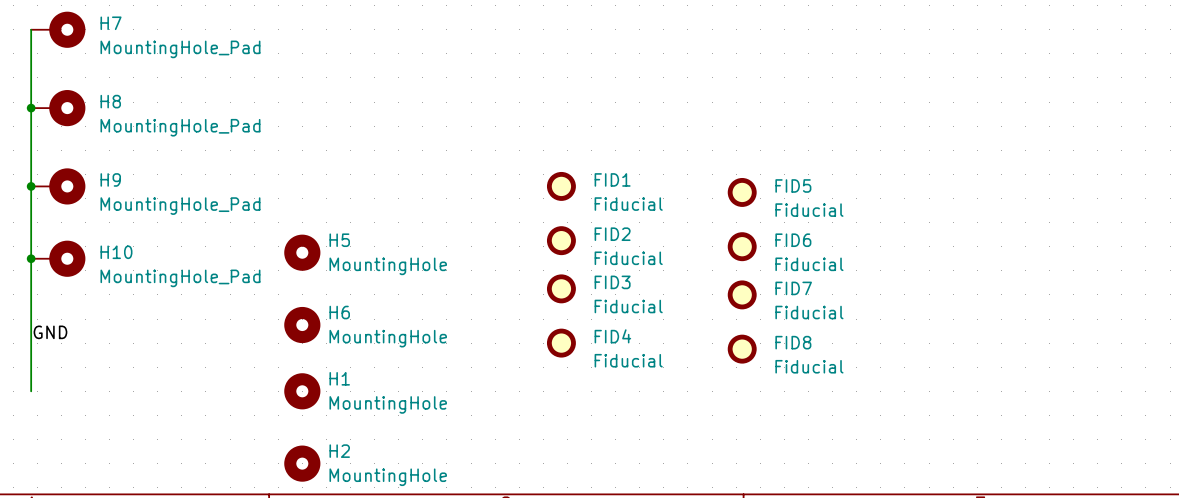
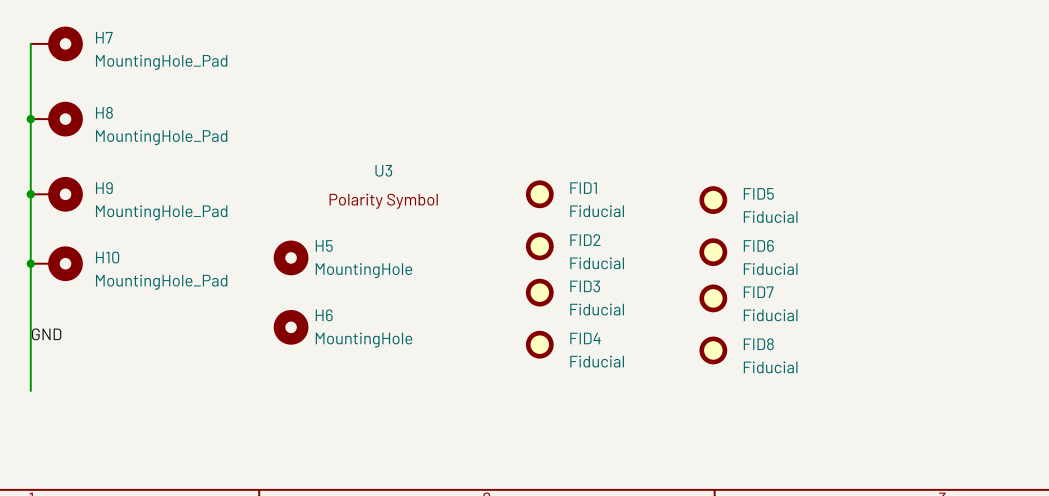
U3: none -> (383, 186)
H1: MountingHole (302, 391) -> none
H2: MountingHole (302, 463) -> none

